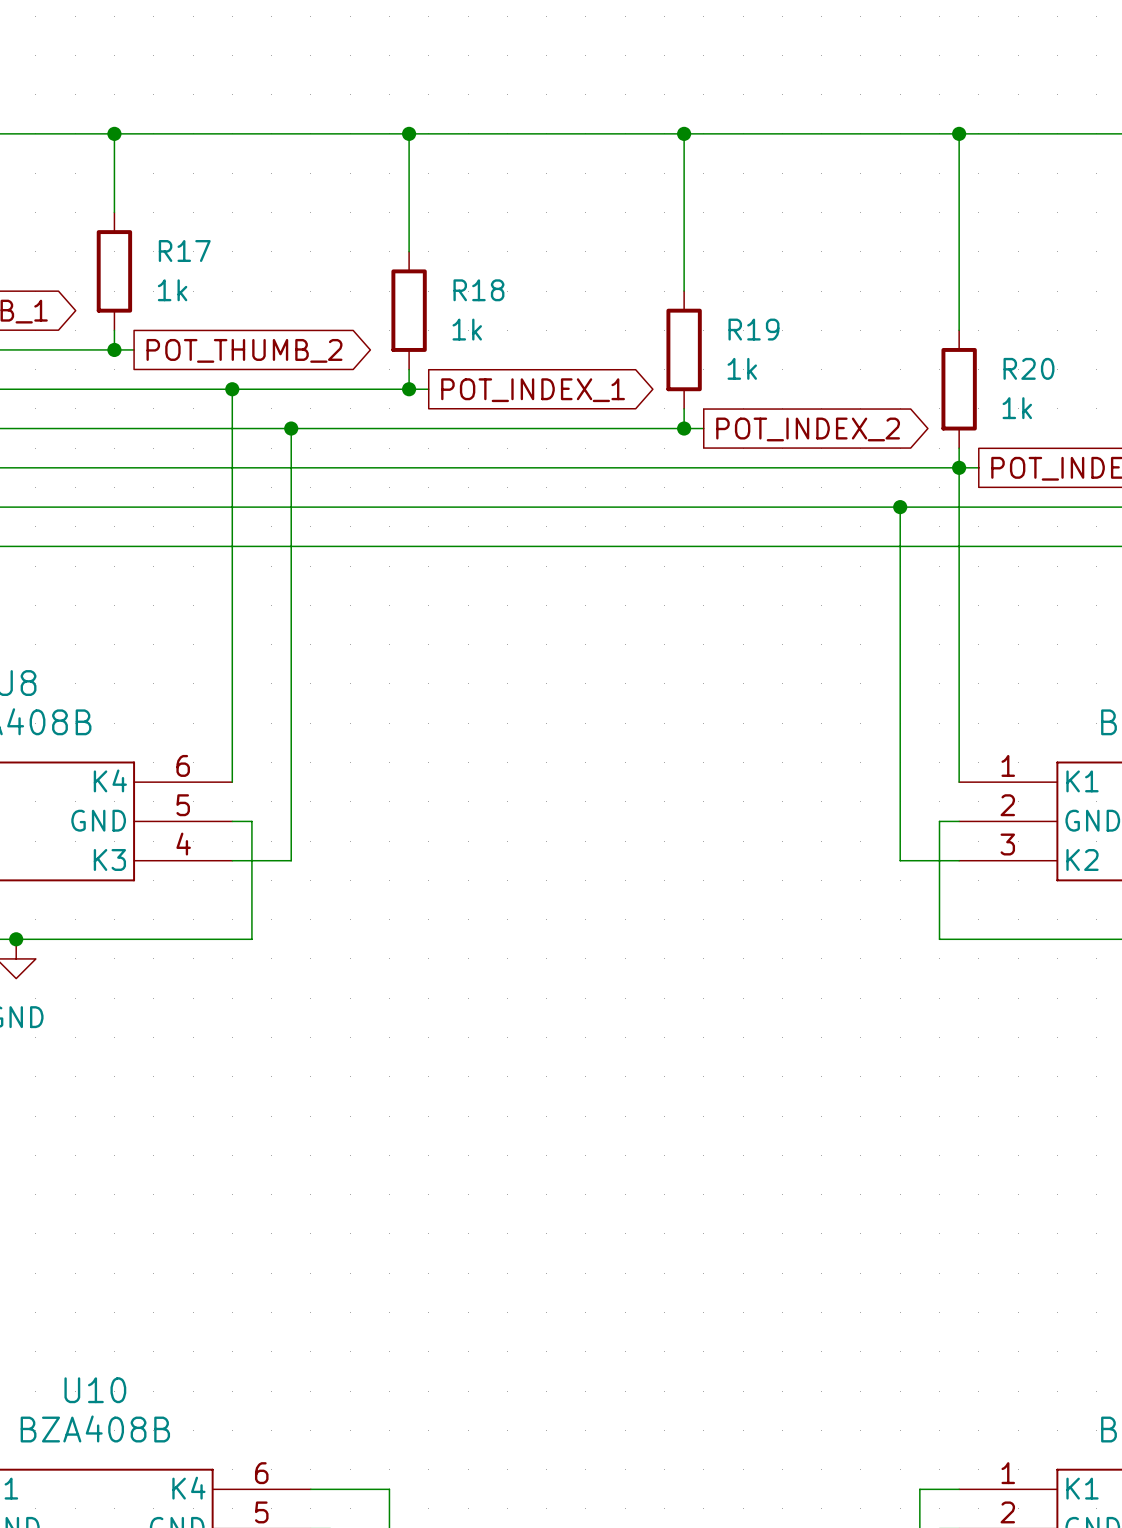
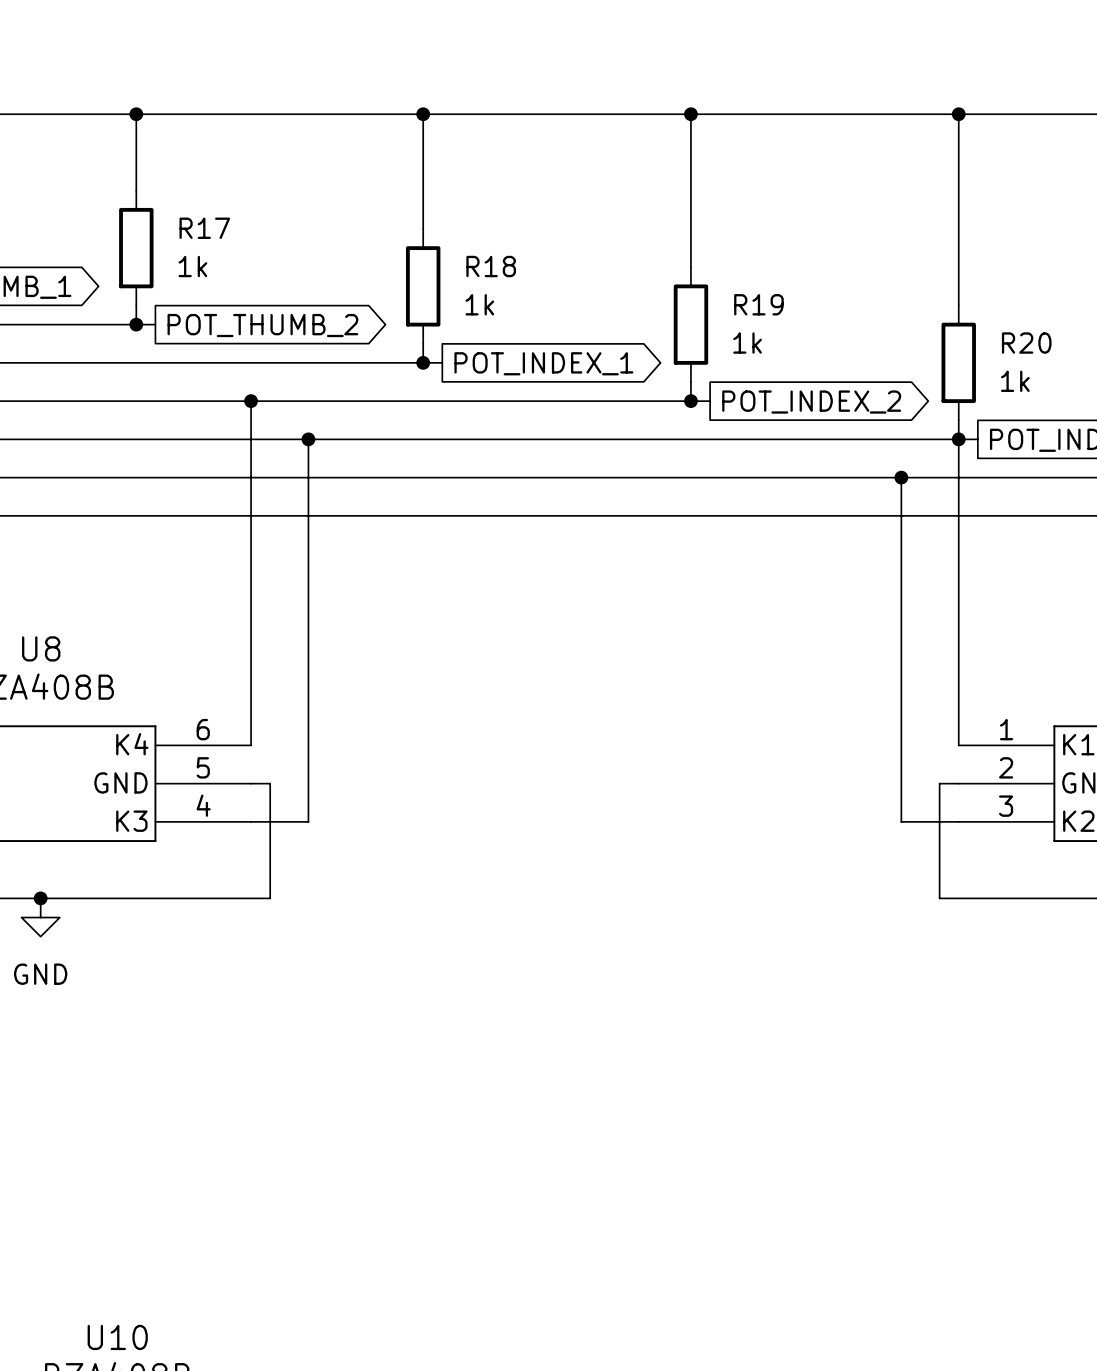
wire: (232, 389) (232, 428) -> none
junction: (232, 389) -> none
junction: none -> (251, 401)
wire: (291, 428) (291, 467) -> none
junction: (291, 428) -> none
junction: none -> (308, 439)

